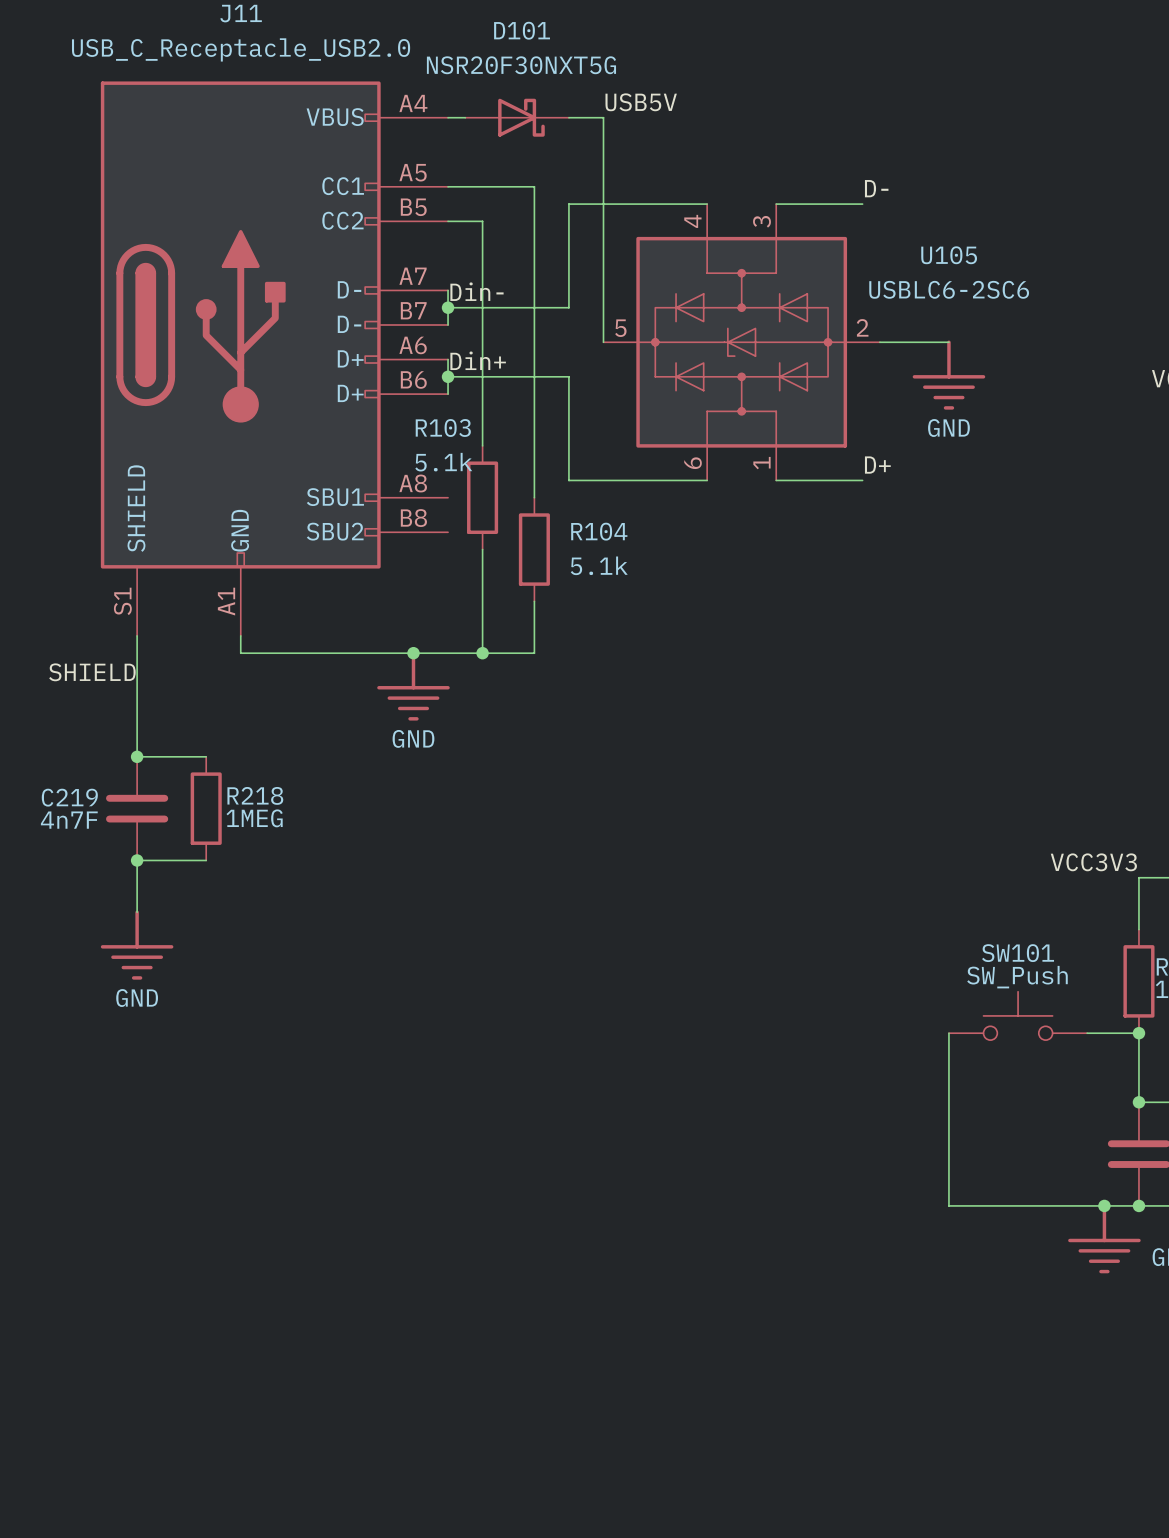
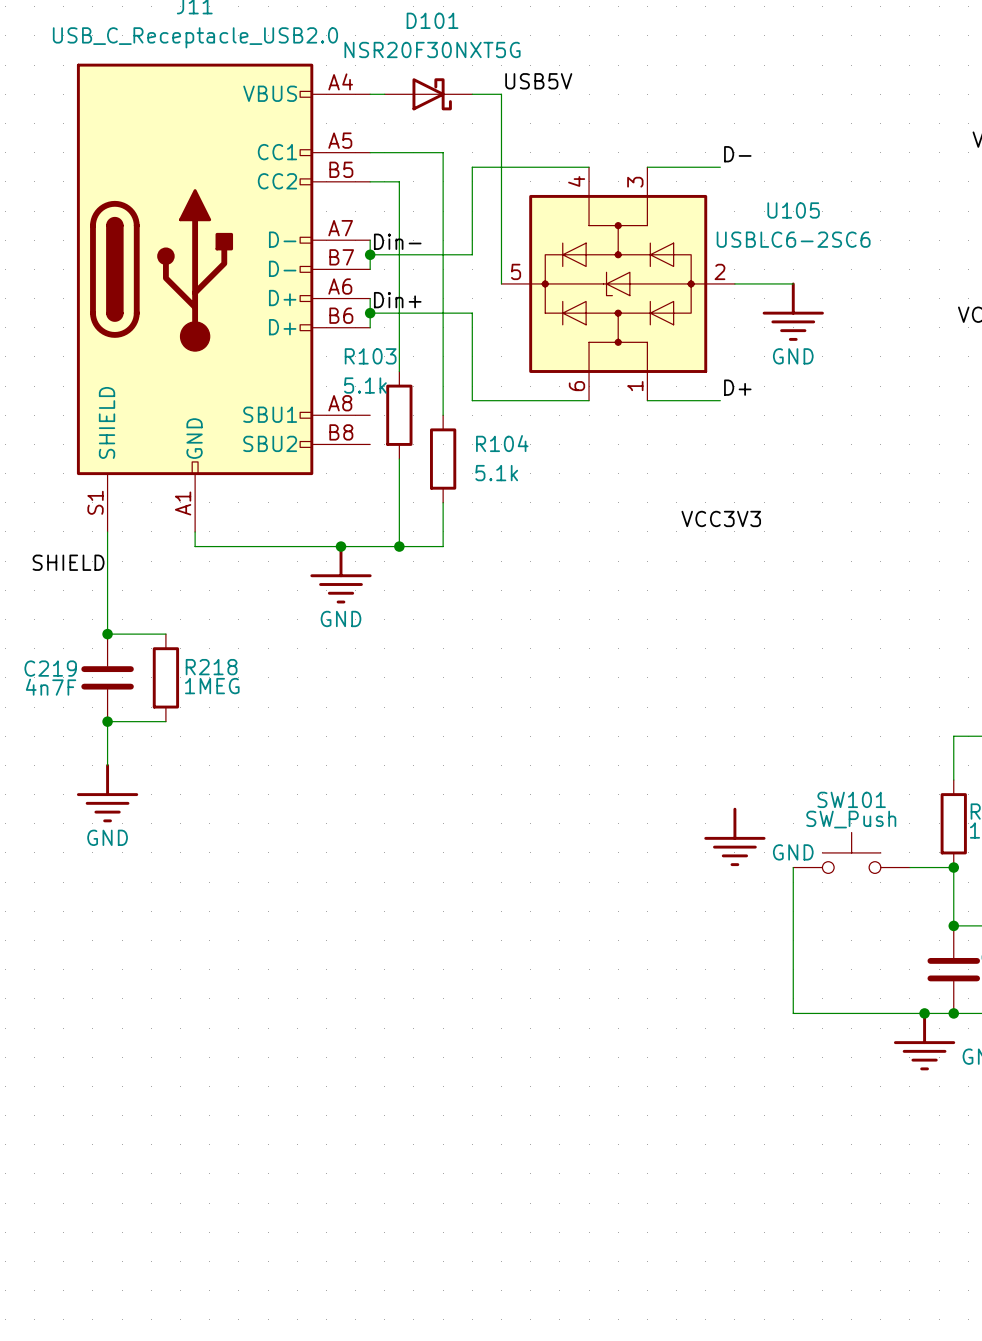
label position: VCC3V3 (1093, 862) -> VCC3V3 (721, 518)
power symbol: none -> GND (734, 836)

